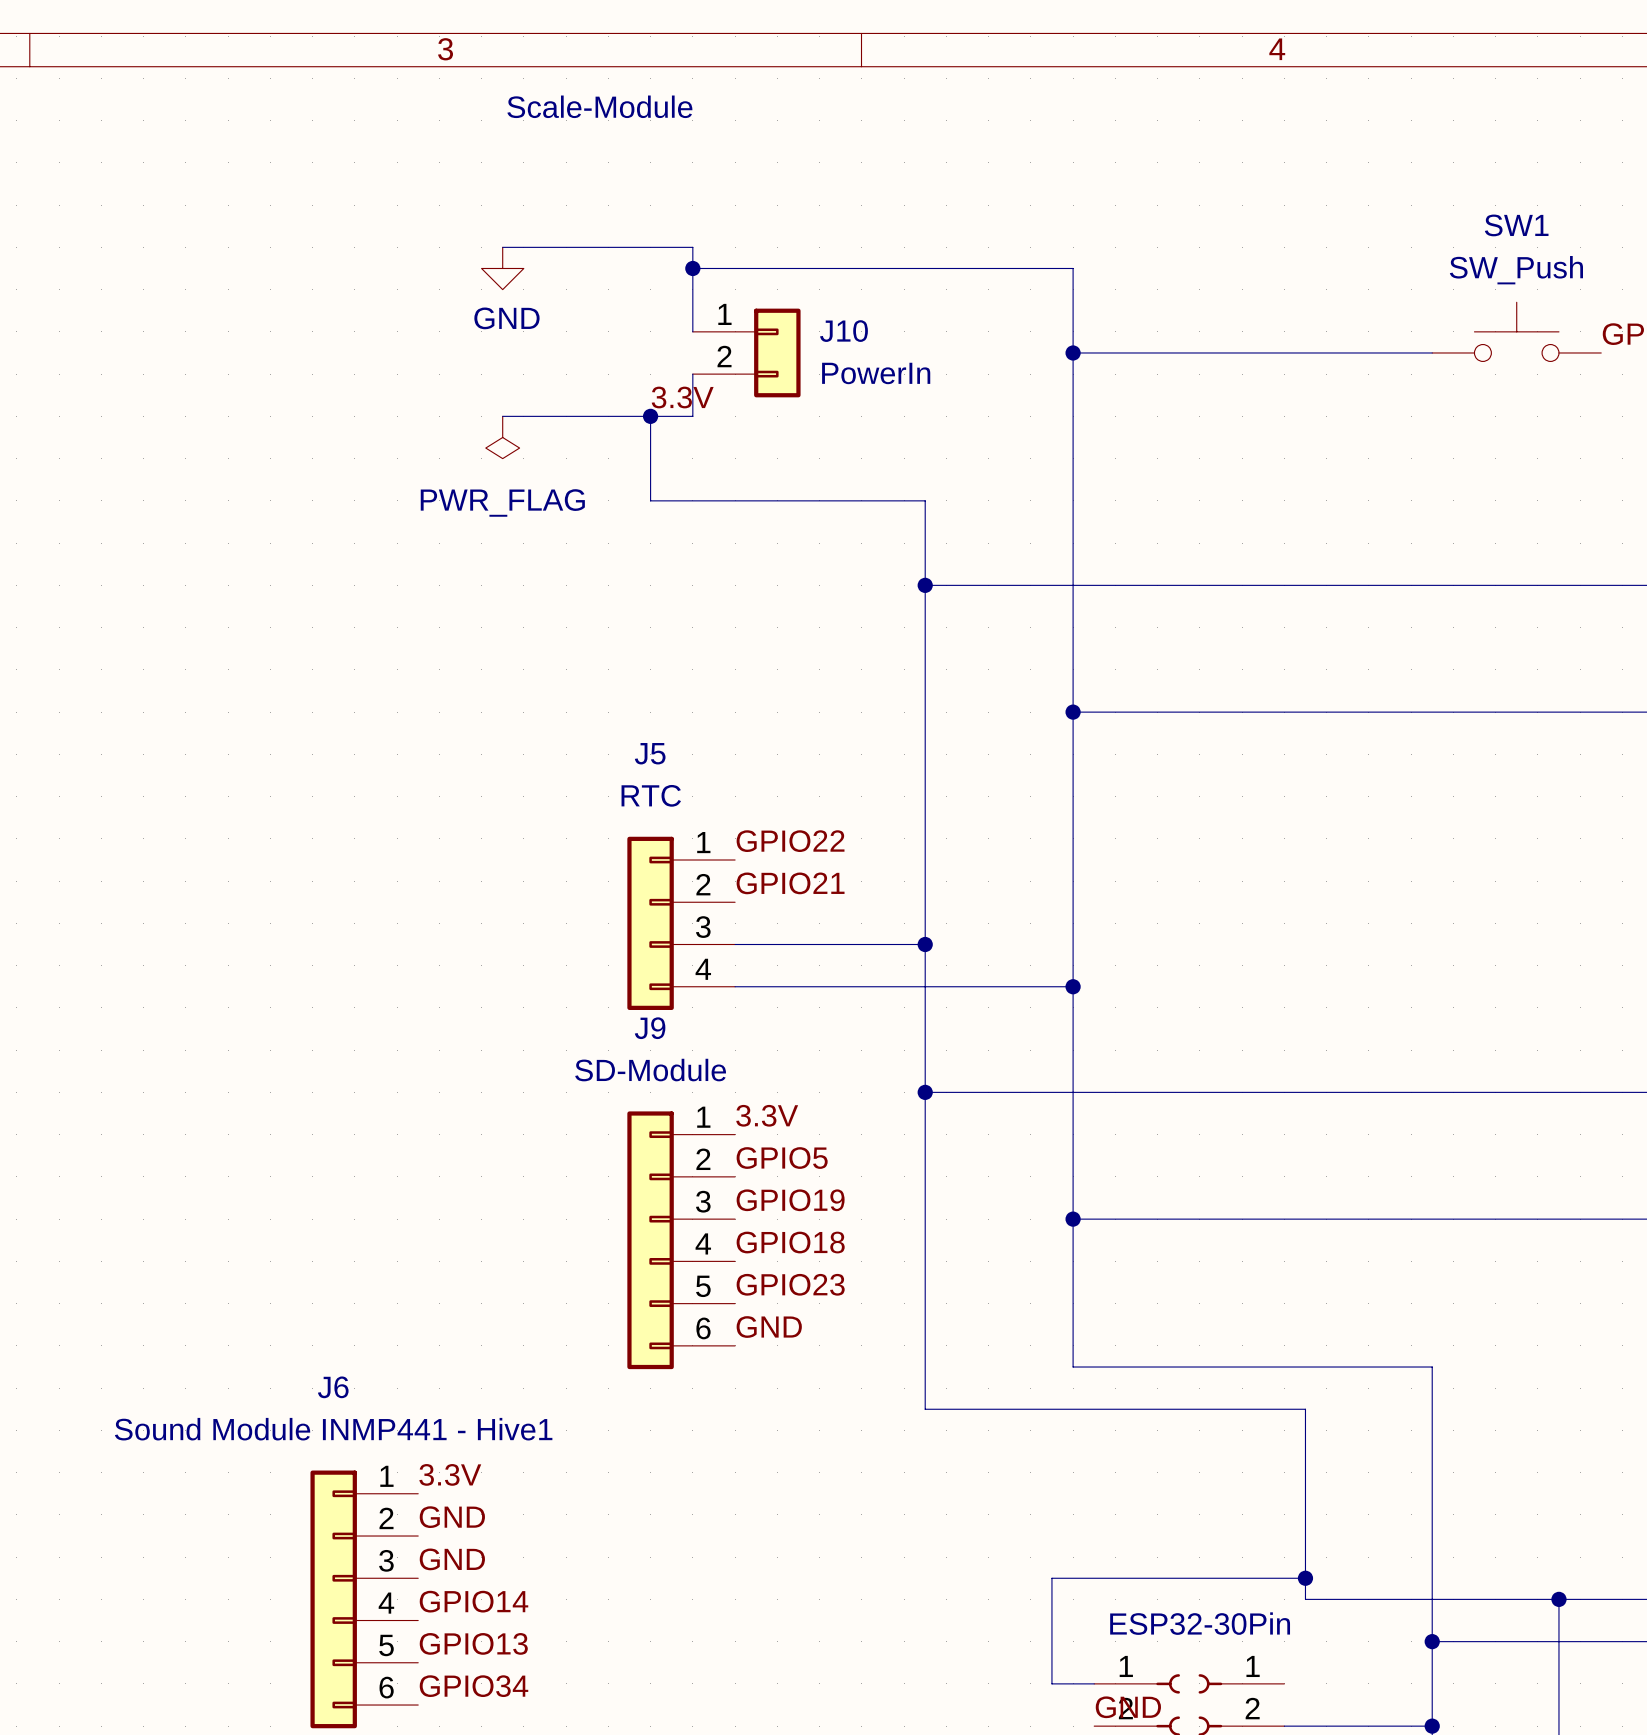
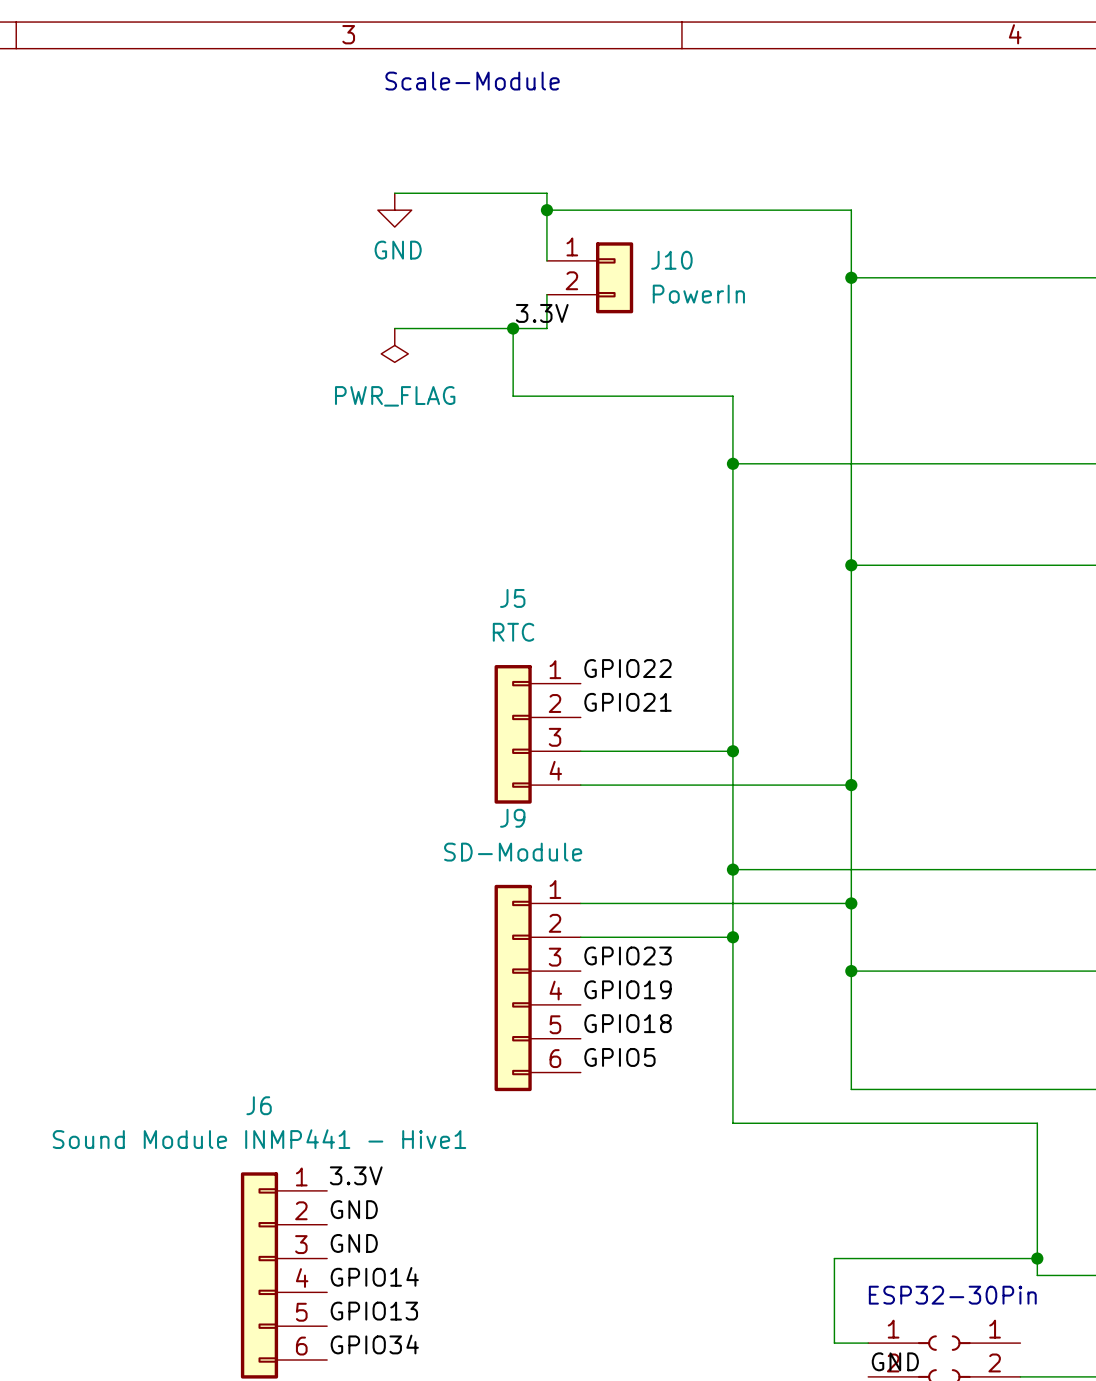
label: 3.3V (767, 1115) -> none
wire: none -> (580, 903) (851, 903)
junction: none -> (851, 903)
label: GPIO5 (782, 1158) -> none
wire: none -> (580, 937) (732, 937)
junction: none -> (732, 937)
label: GPIO19 (790, 1200) -> GPIO23 (628, 955)
label: GPIO18 (790, 1242) -> GPIO19 (628, 989)
label: GPIO23 (790, 1284) -> GPIO18 (628, 1023)
label: GND (769, 1327) -> GPIO5 (619, 1057)

